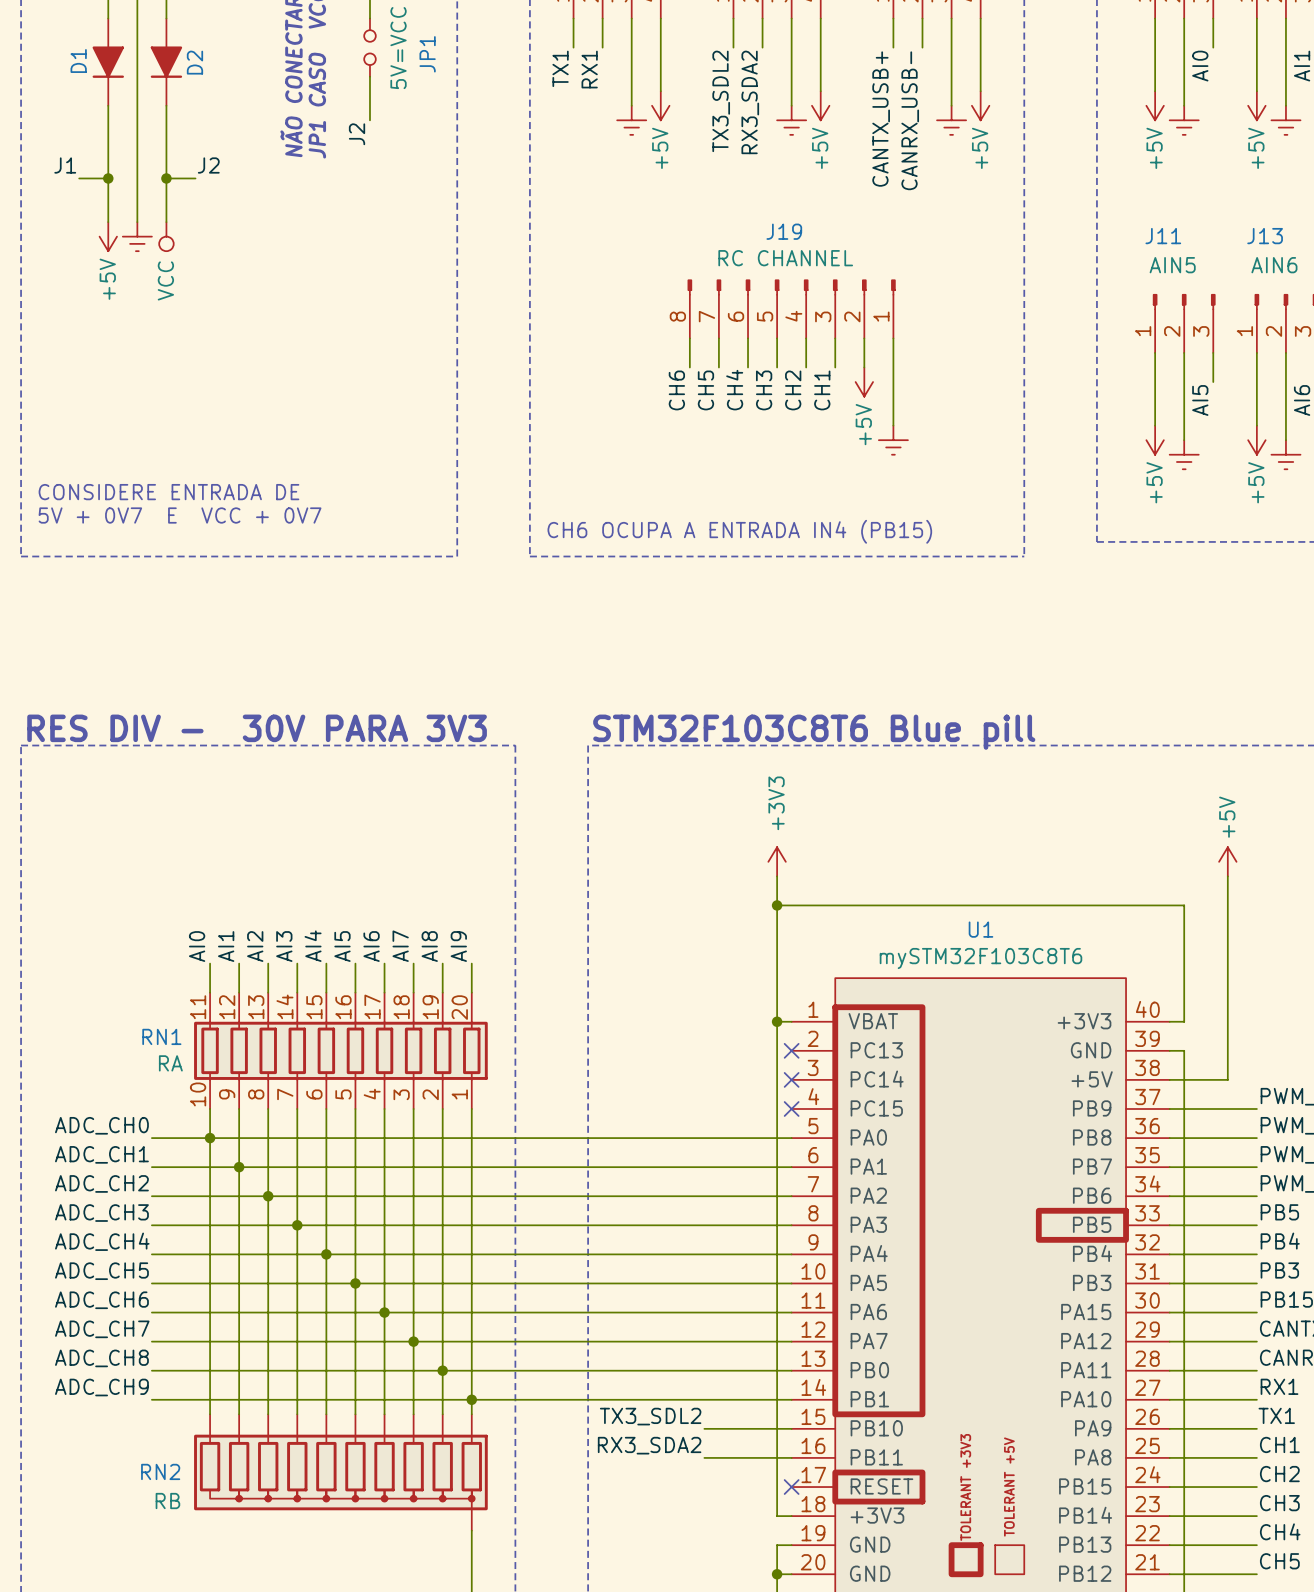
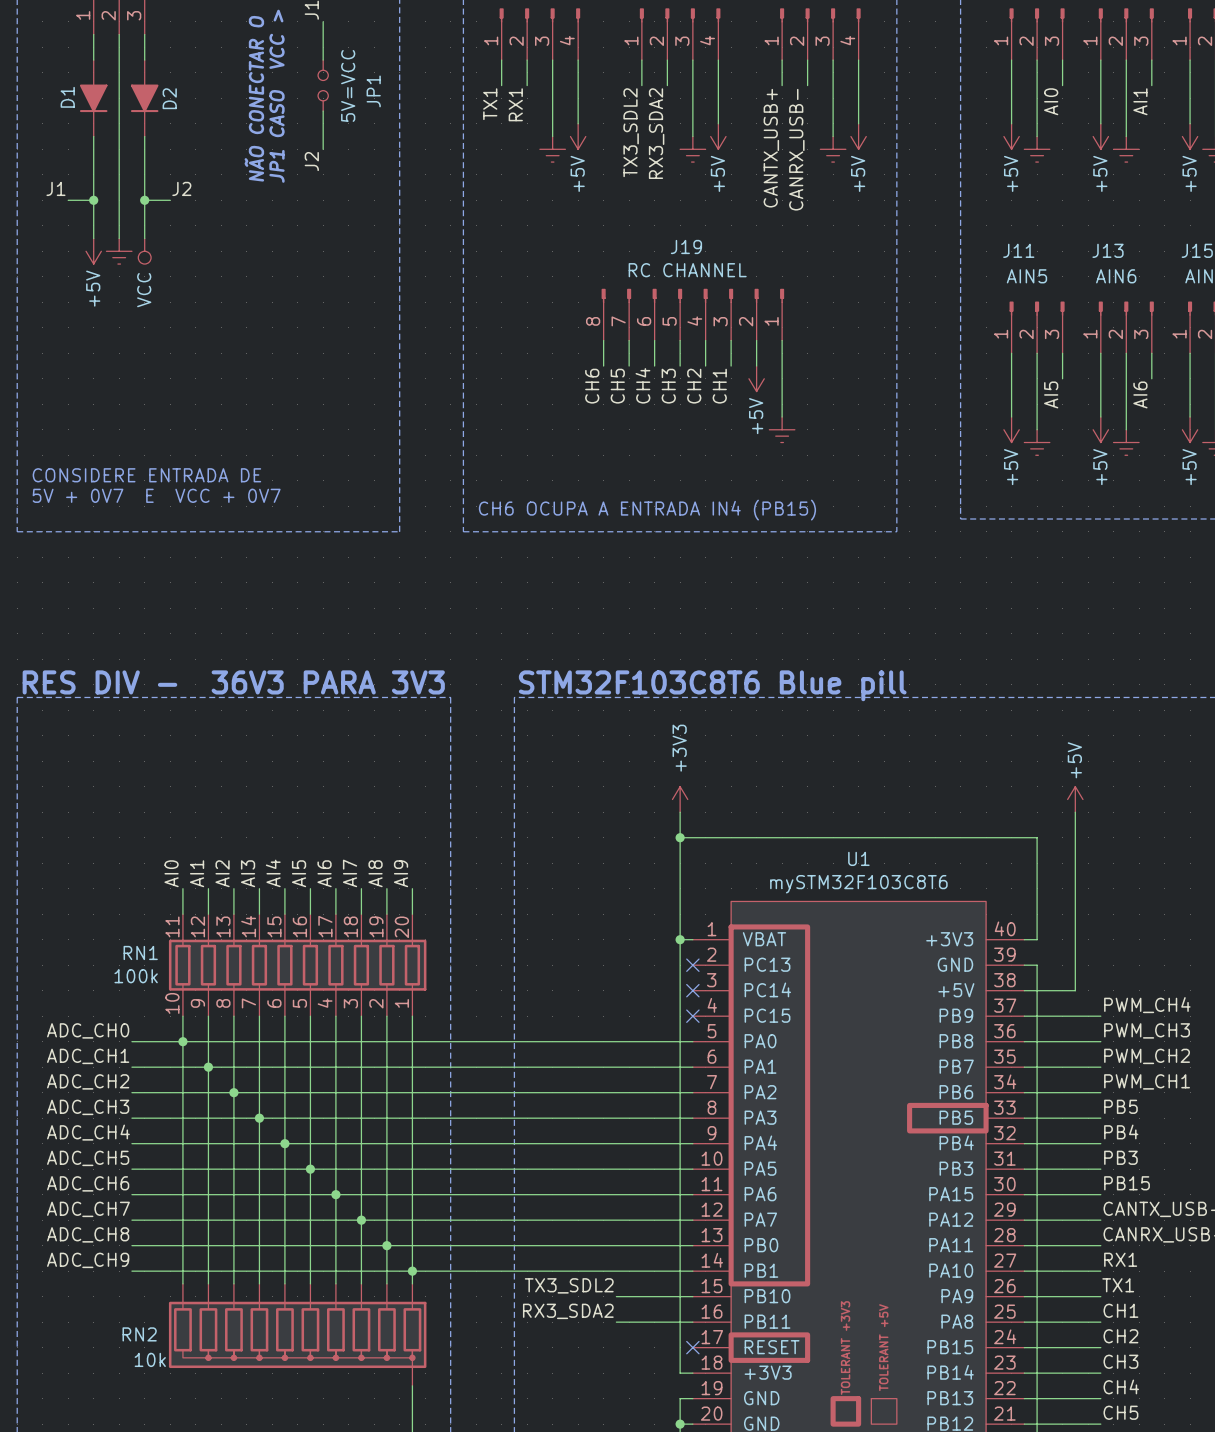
text: RES DIV - 30V PARA 3V3 (257, 728) -> RES DIV - 36V3 PARA 3V3 (233, 682)
RN1 value: RA (170, 1063) -> 100k (136, 976)
RN2 value: RB (167, 1501) -> 10k (150, 1359)

